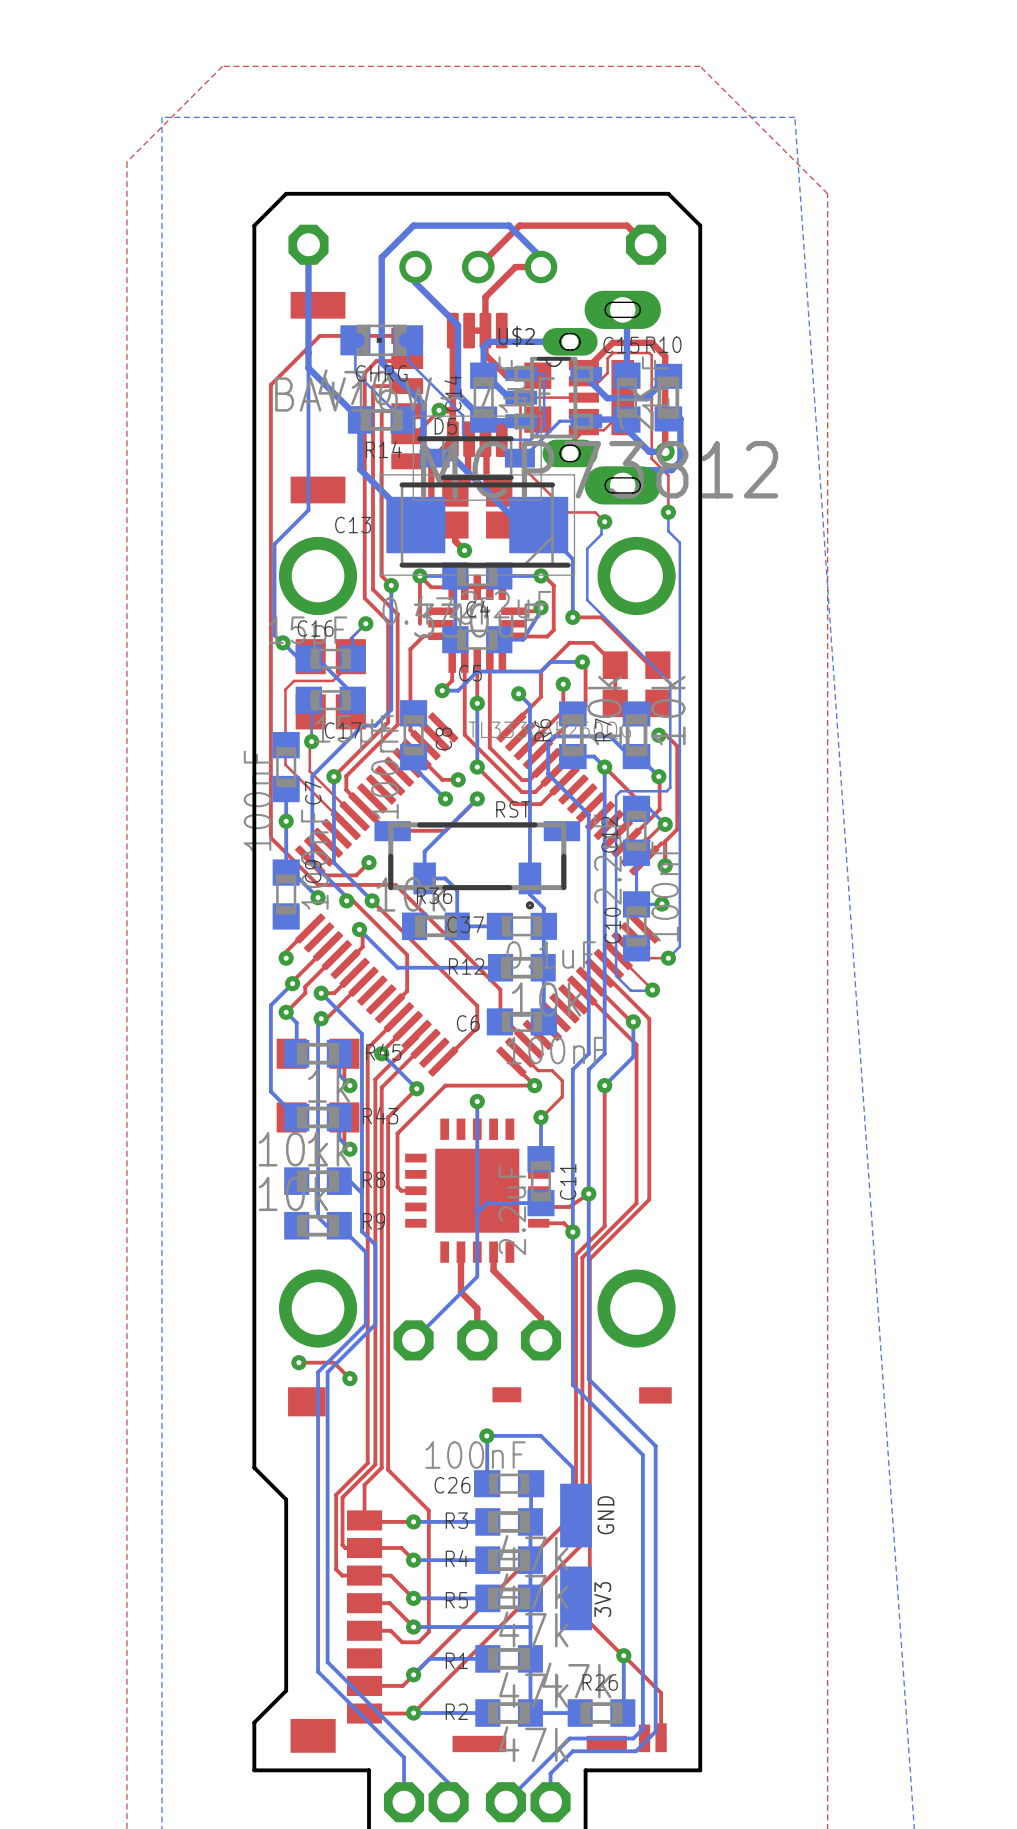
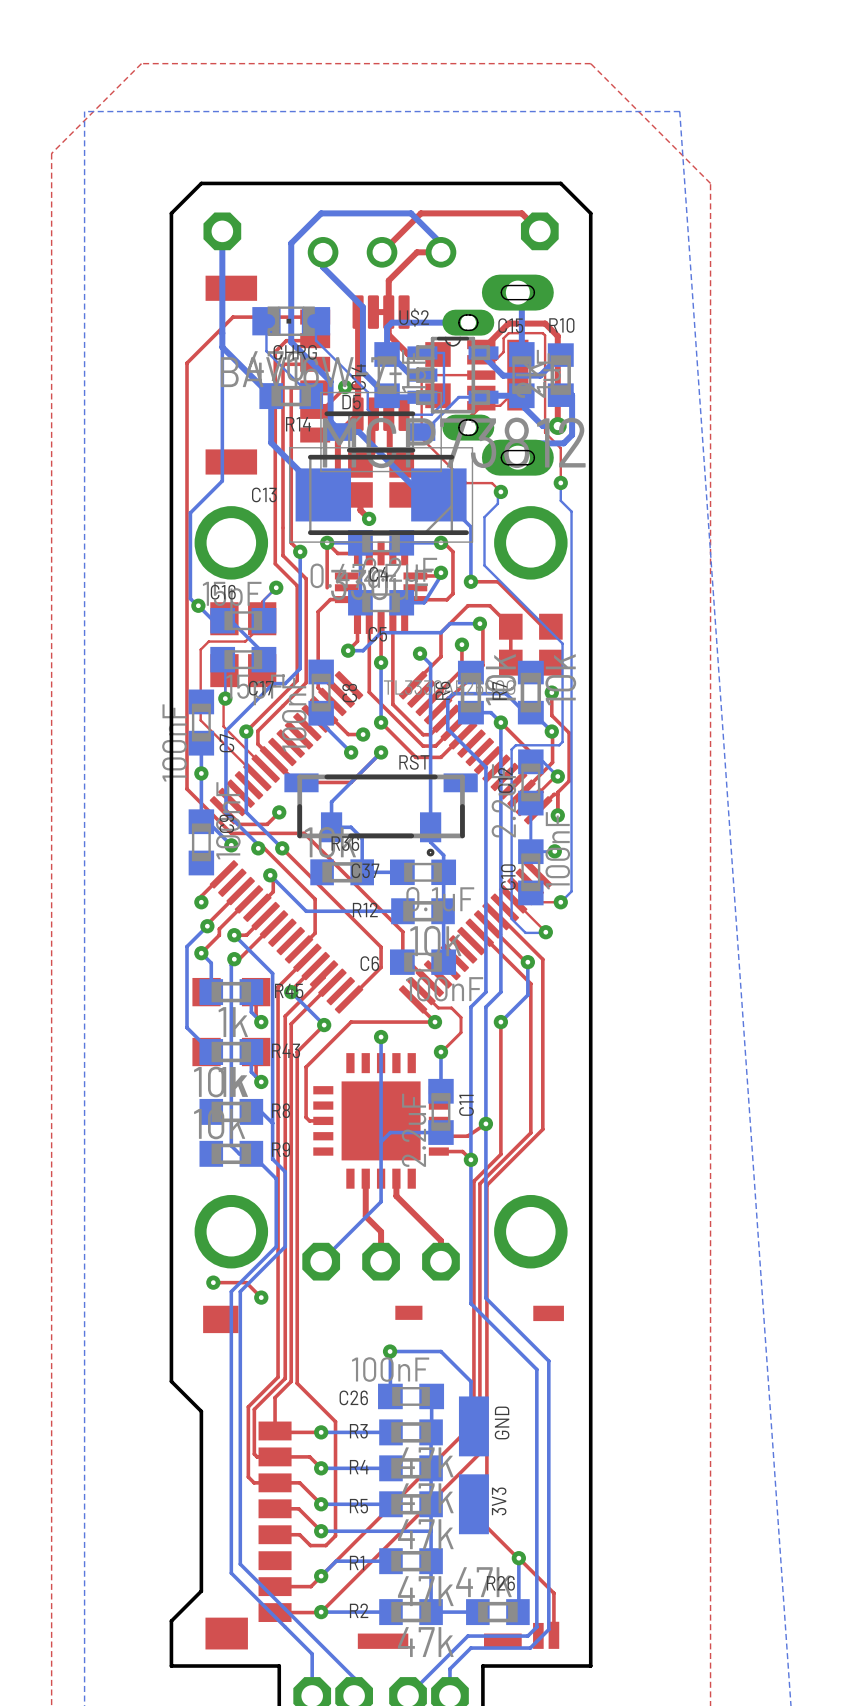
top track: (658, 735) (666, 735) (677, 746) (677, 778) -> (551, 692) (551, 715) (569, 732)

